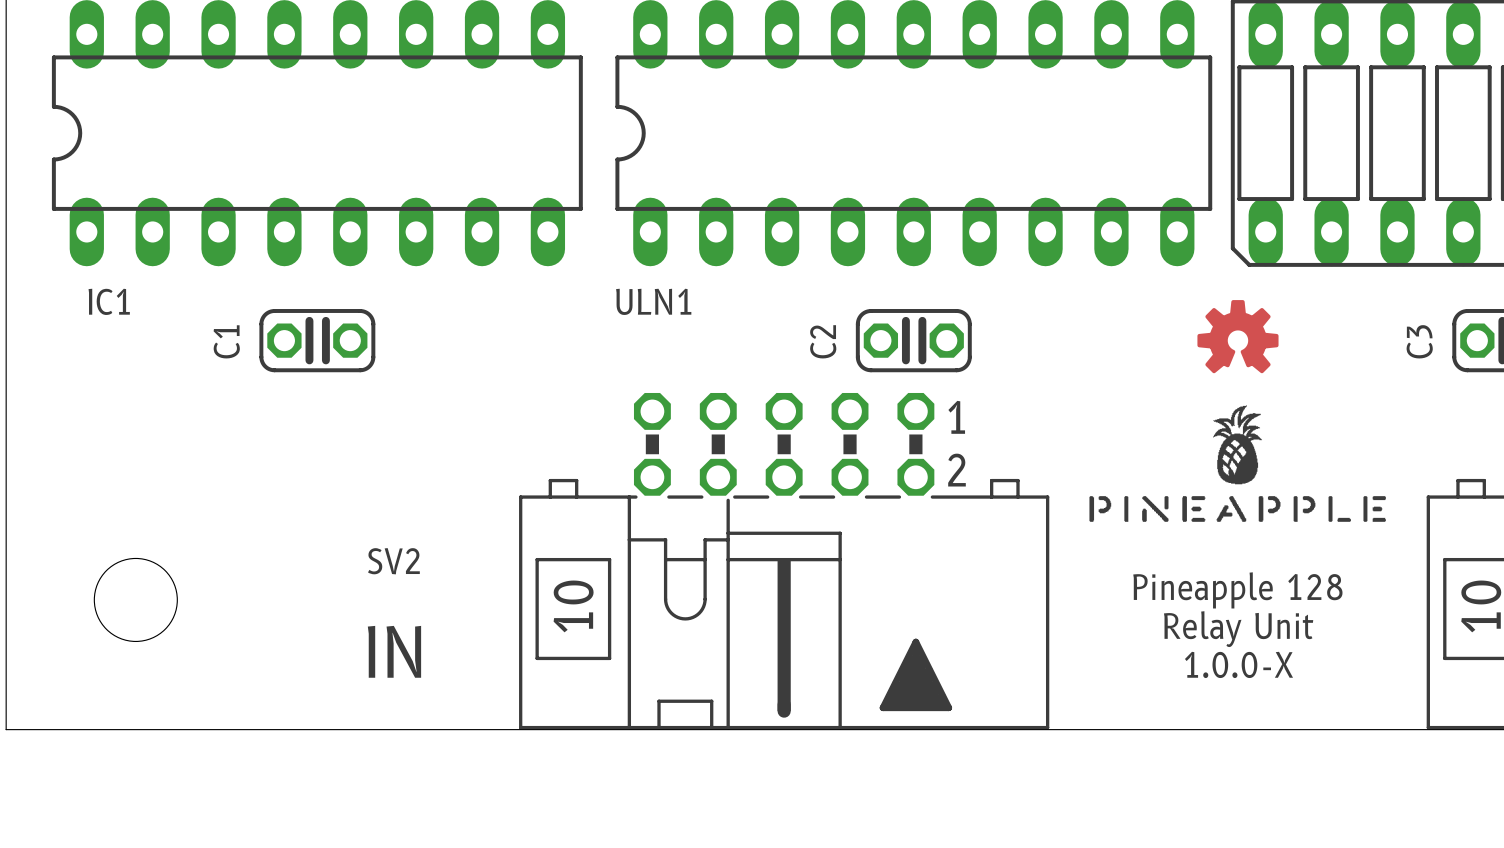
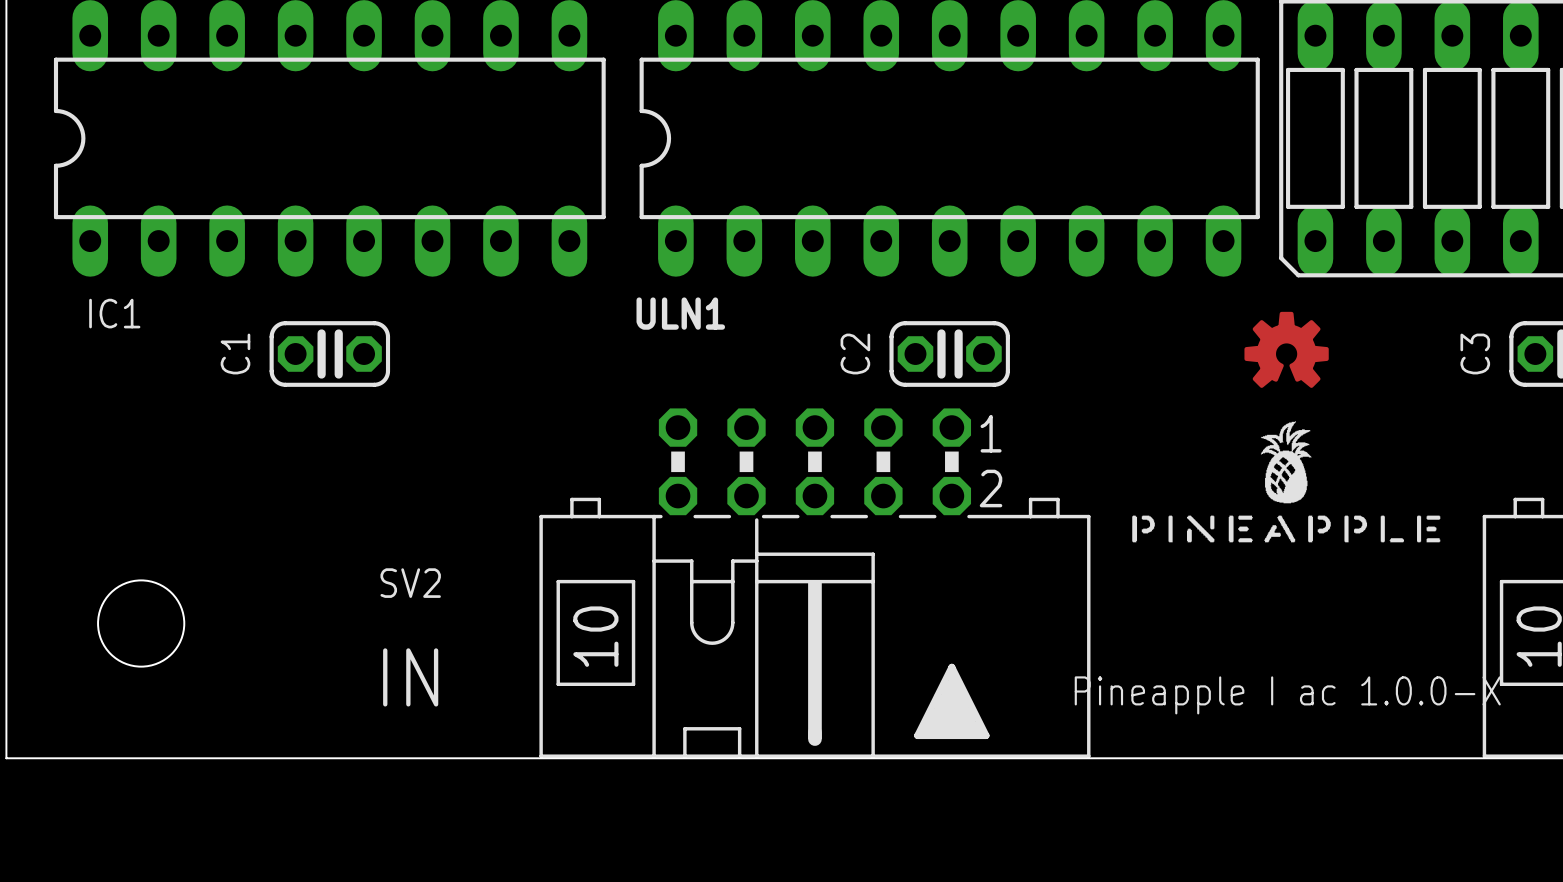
text: Pineapple 128 (1237, 590) -> none
text: Relay Unit (1238, 629) -> none
text: 1.0.0-X (1238, 664) -> Pineapple I ac 1.0.0-X (1287, 695)

